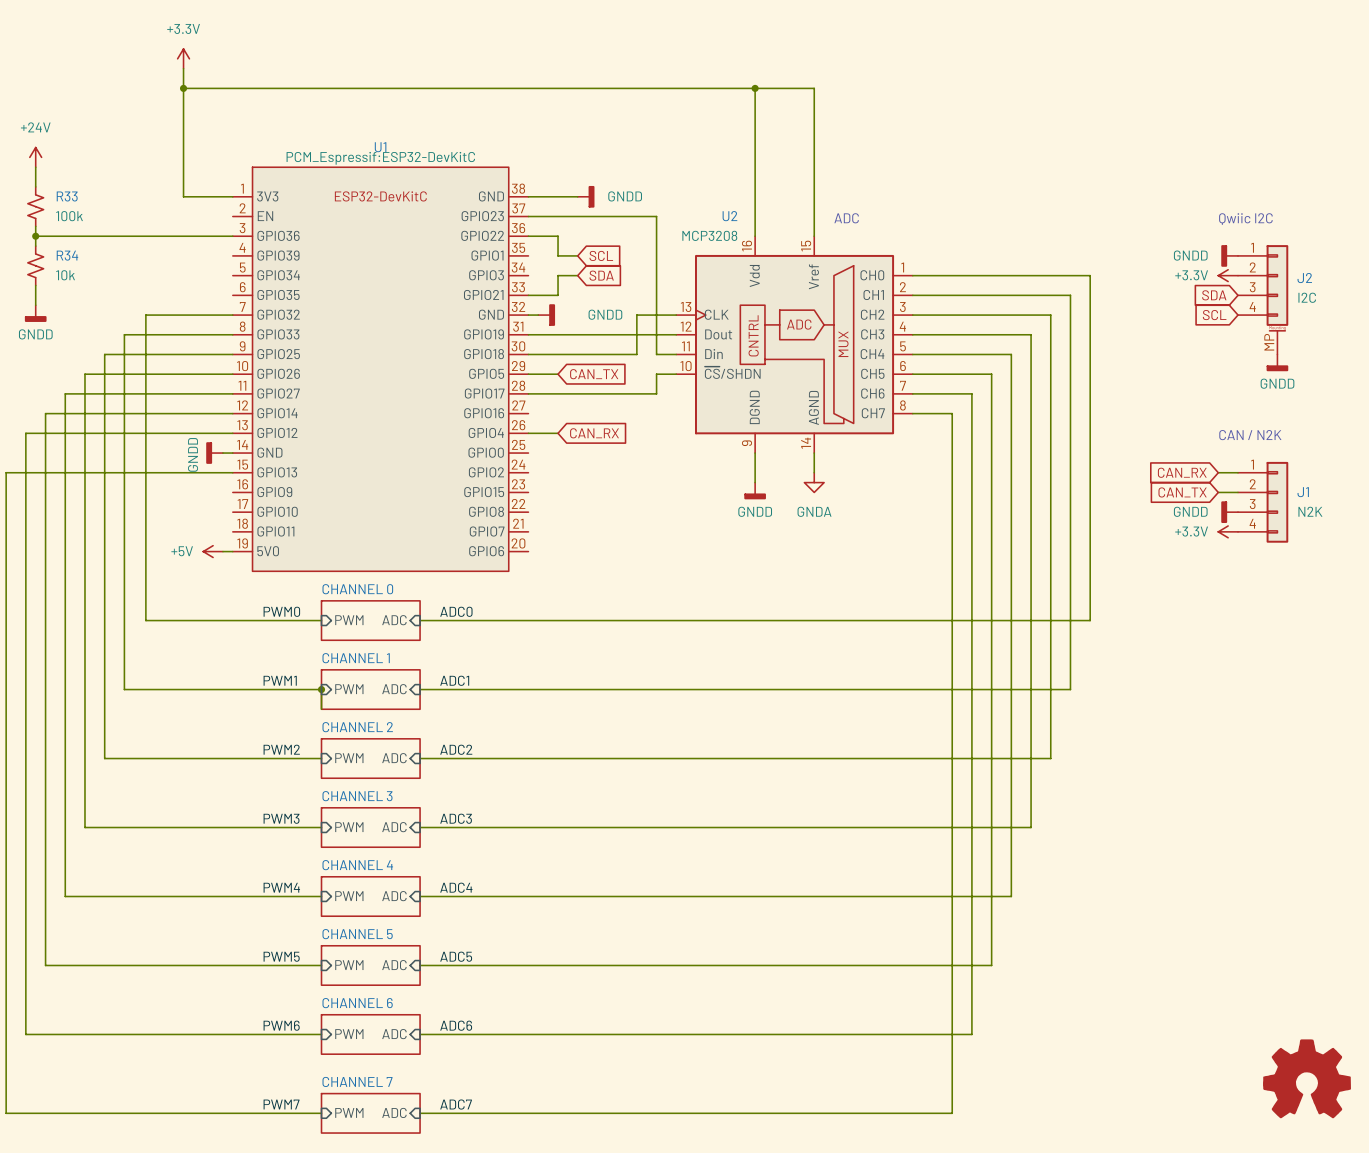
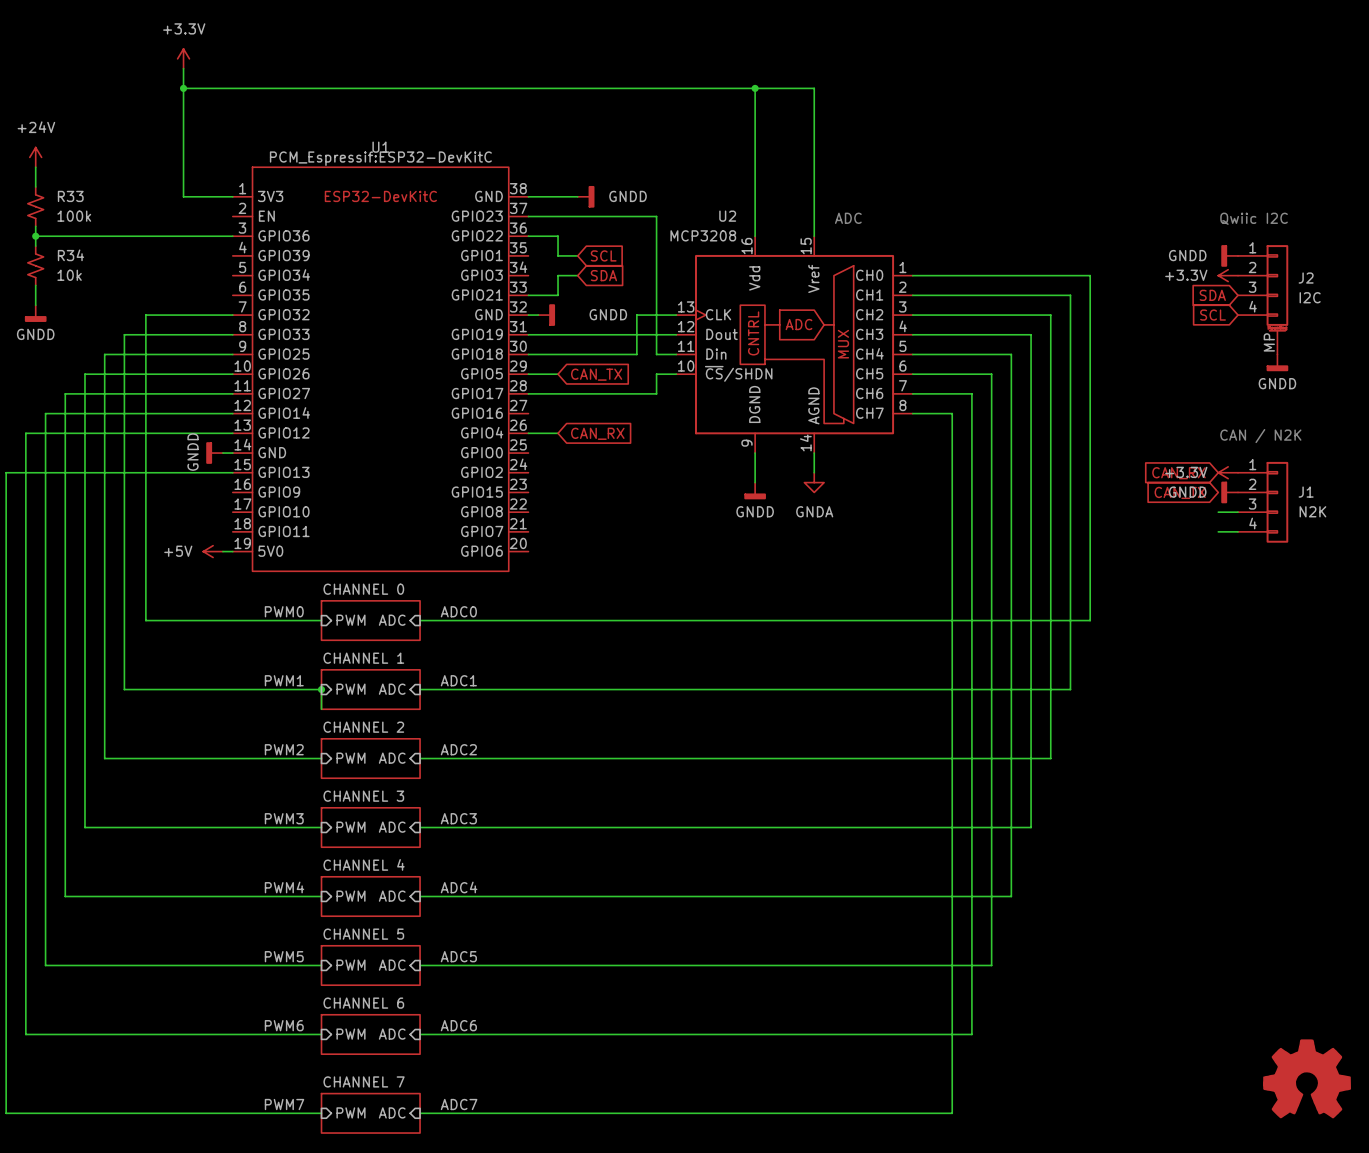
power symbol position: GNDD (1229, 512) -> GNDD (1229, 492)
power symbol position: +3.3V (1228, 531) -> +3.3V (1228, 472)

